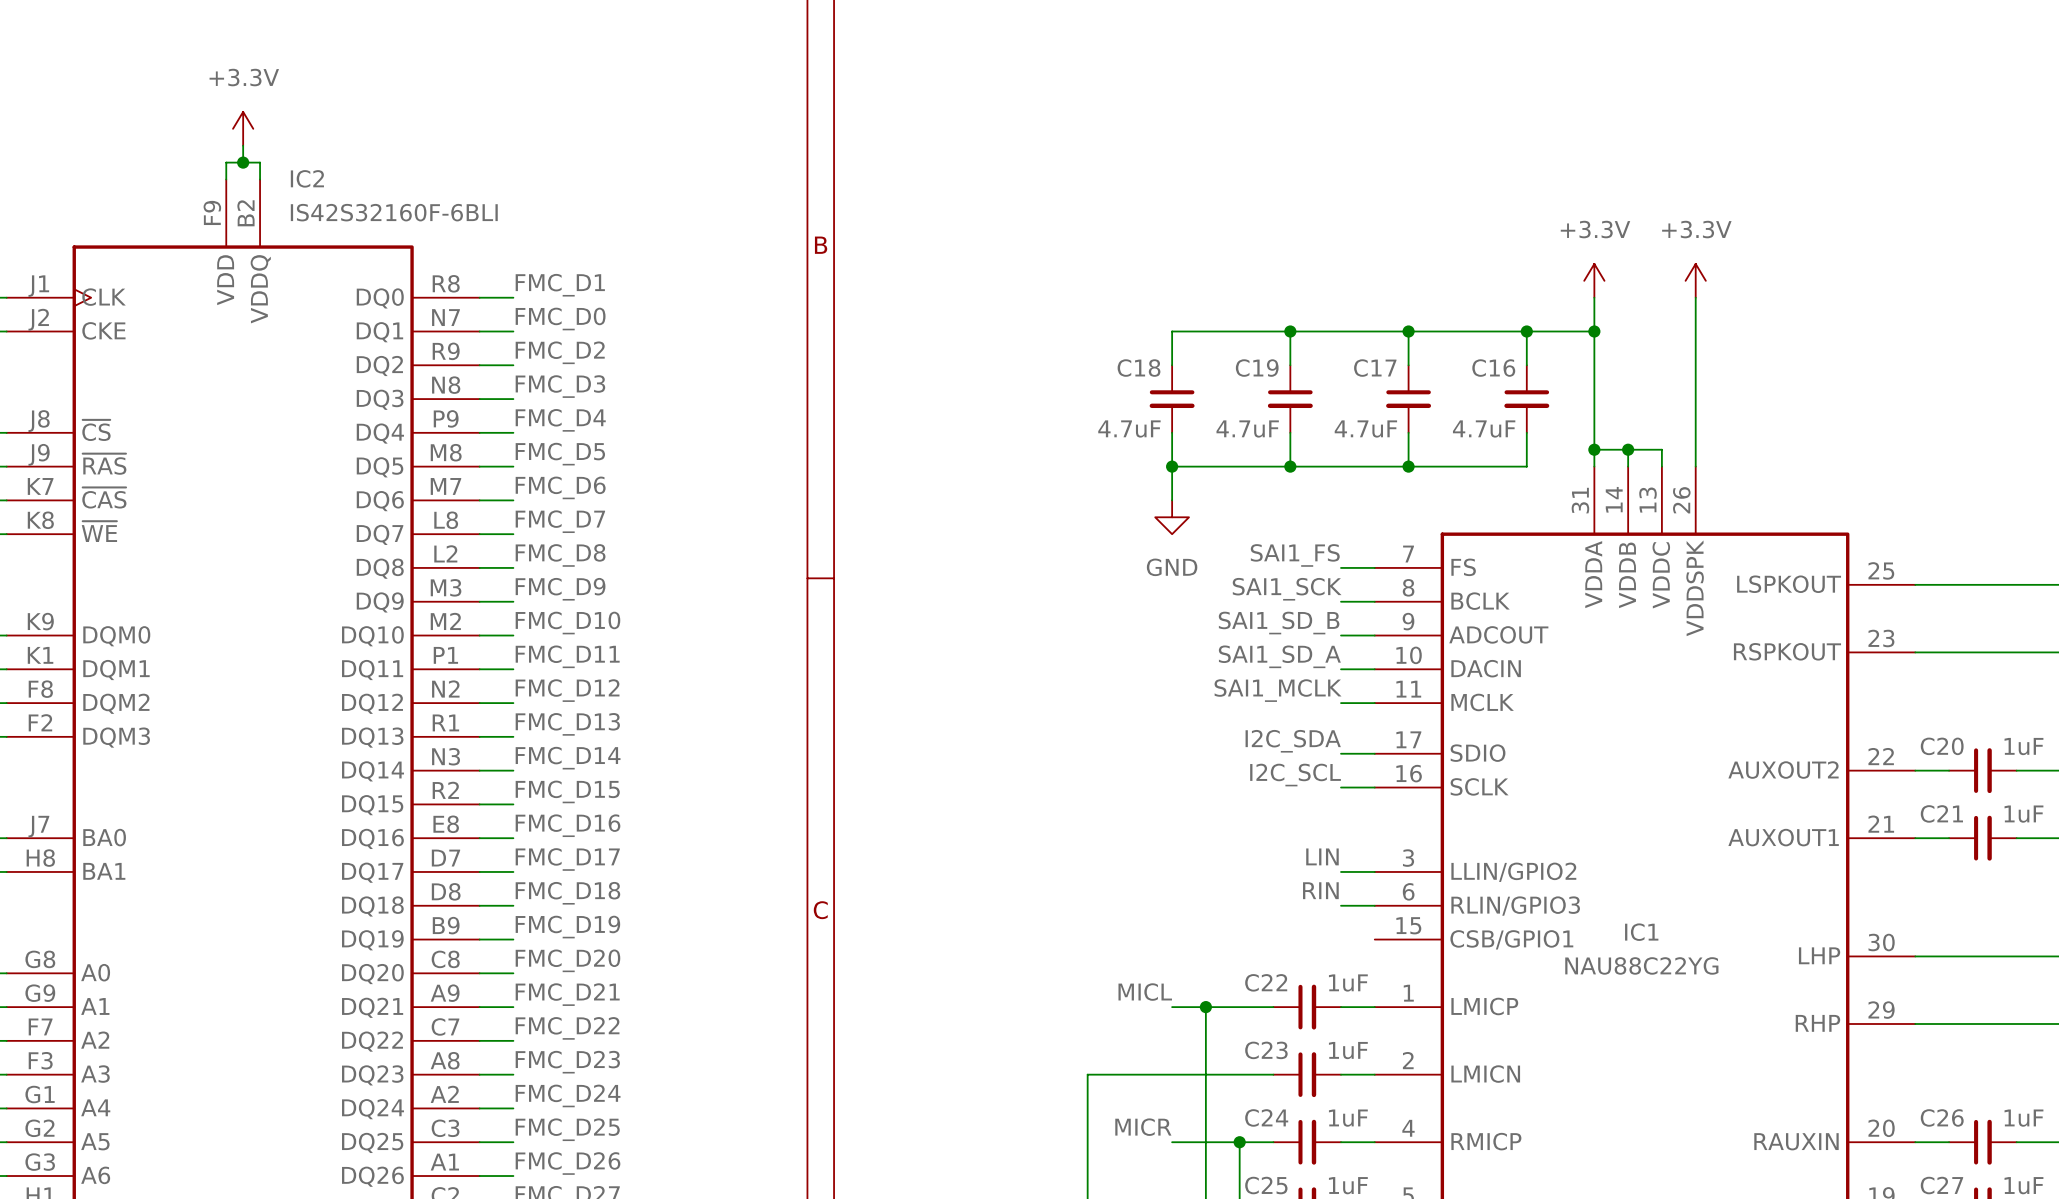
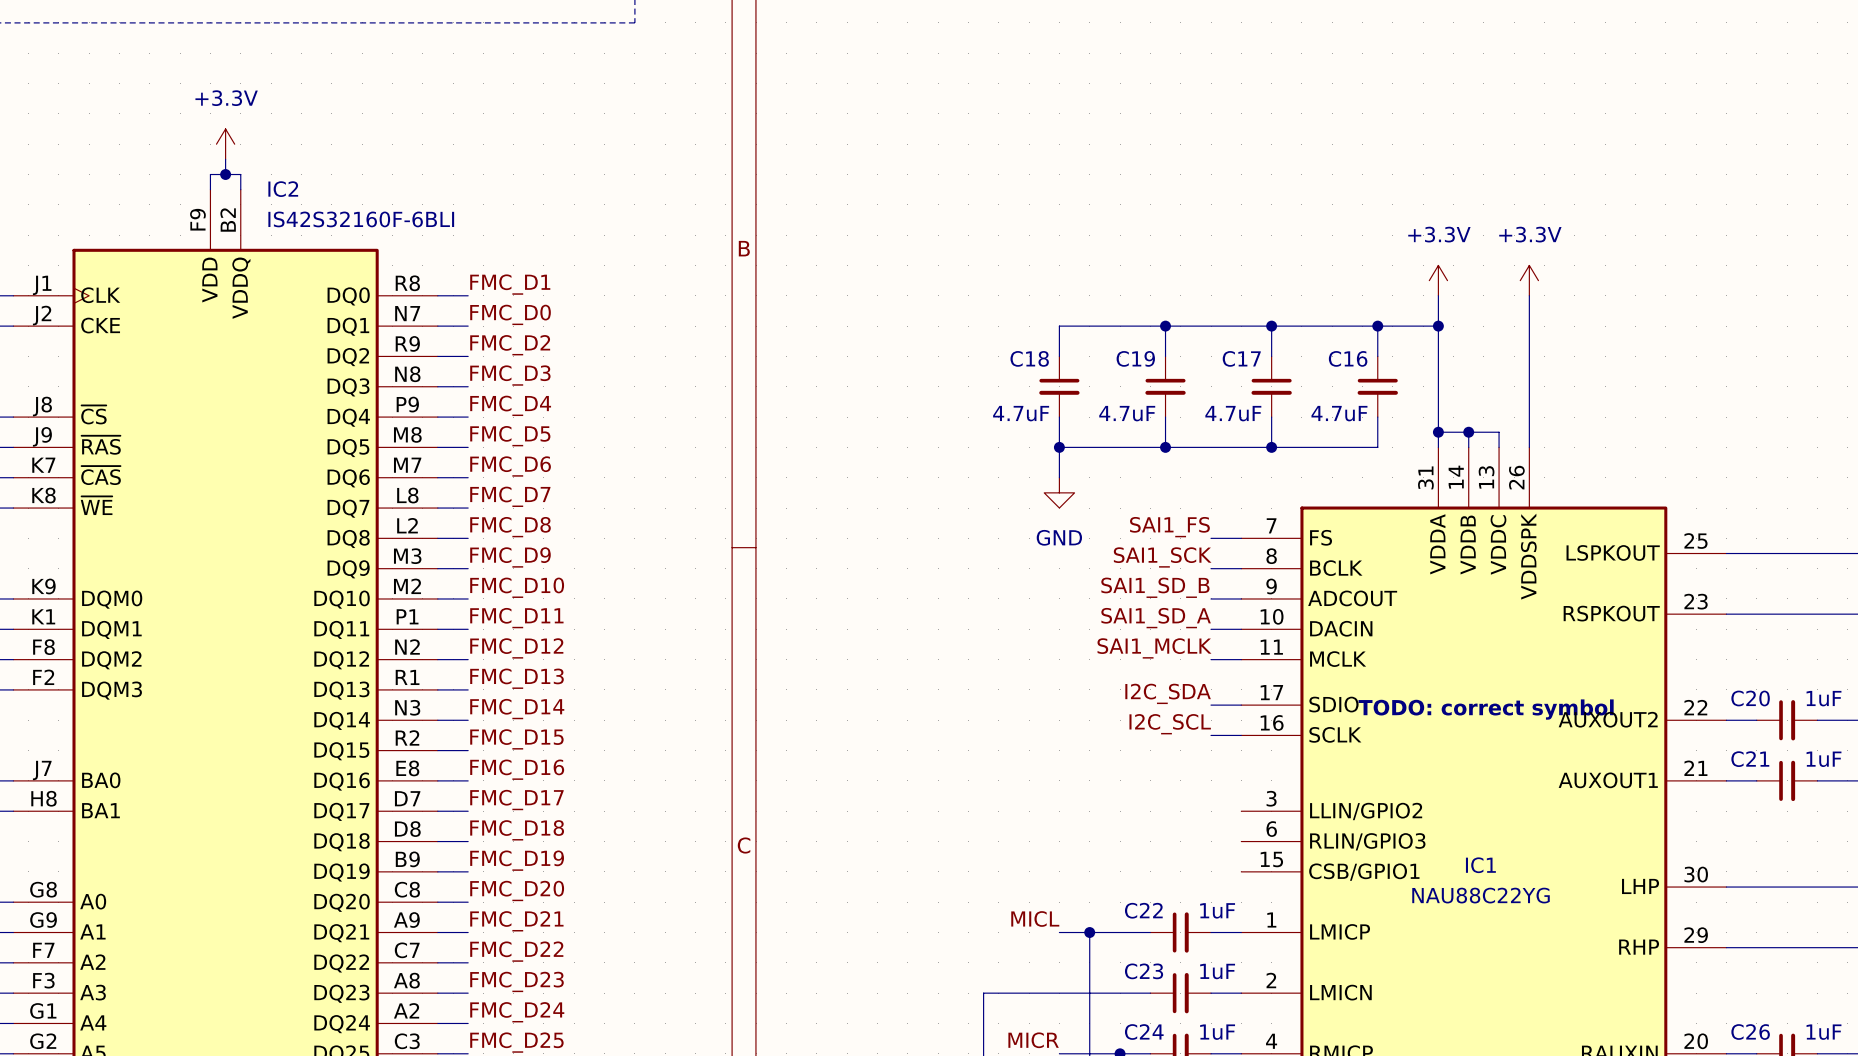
text: none -> TODO: correct symbol (1486, 709)
label: LIN (1322, 856) -> none
wire: (1341, 871) (1374, 871) -> none
label: RIN (1320, 890) -> none
wire: (1341, 905) (1374, 905) -> none

